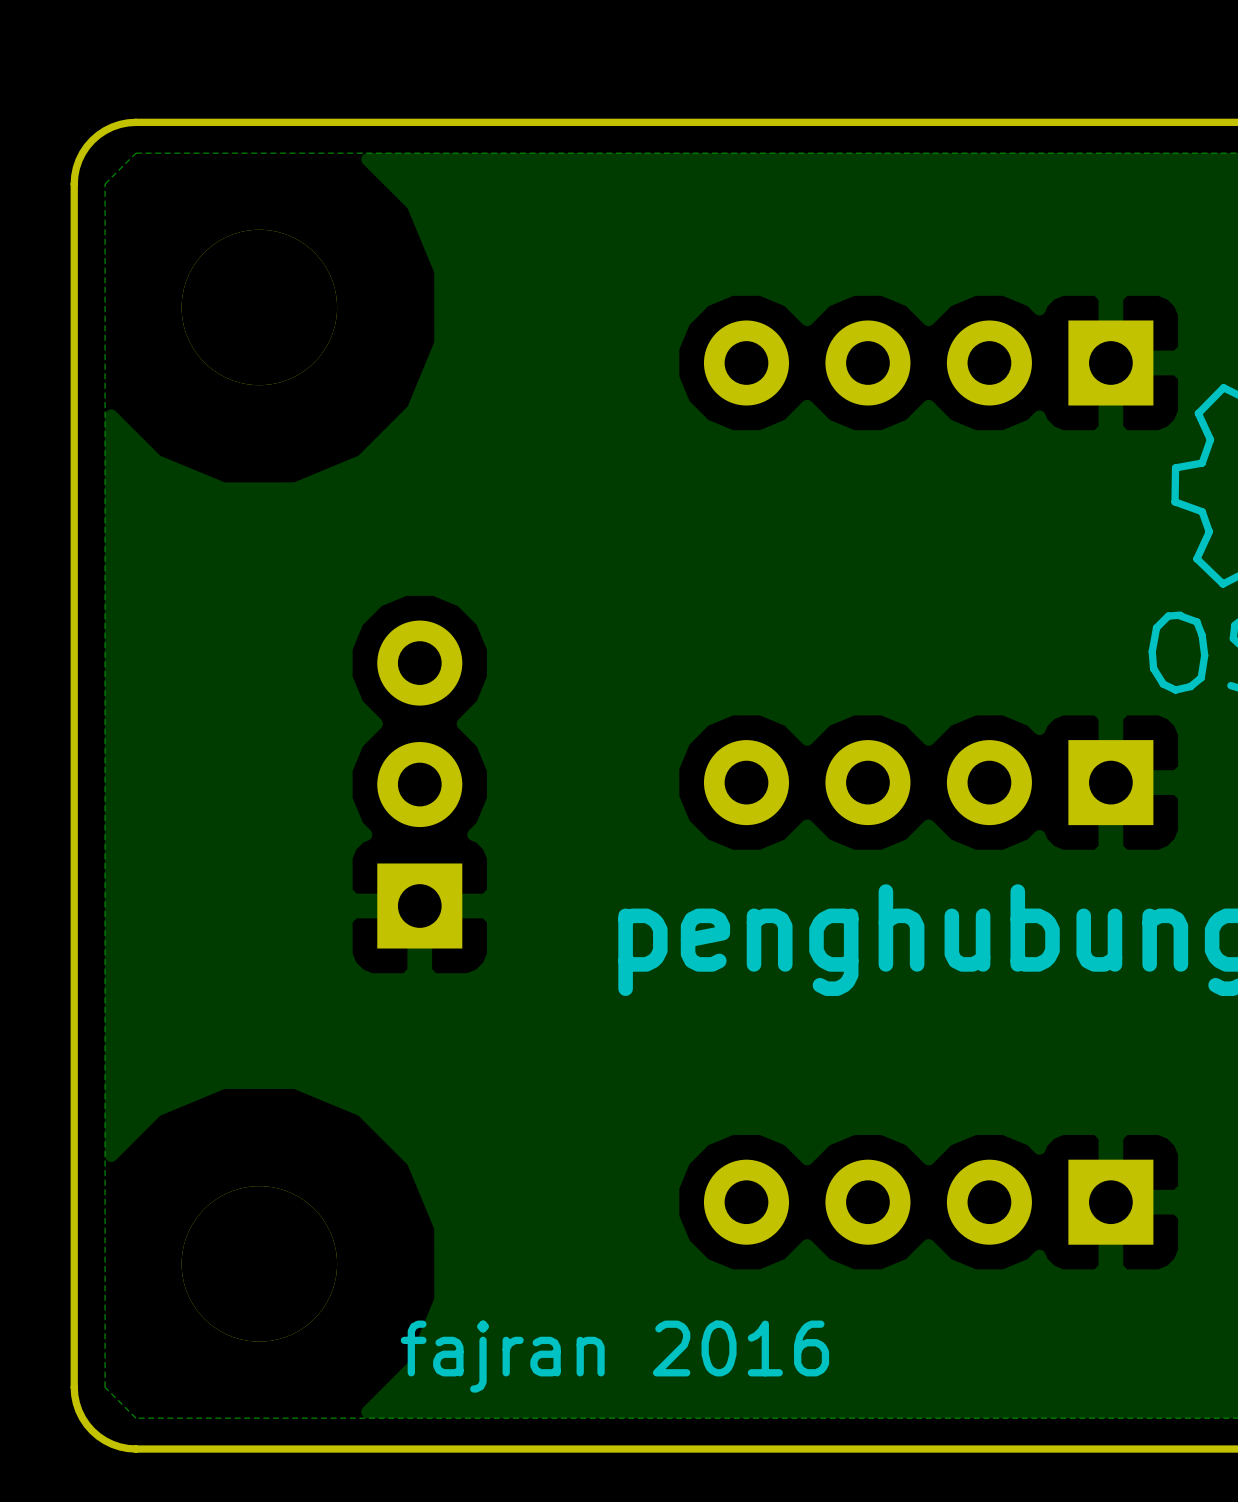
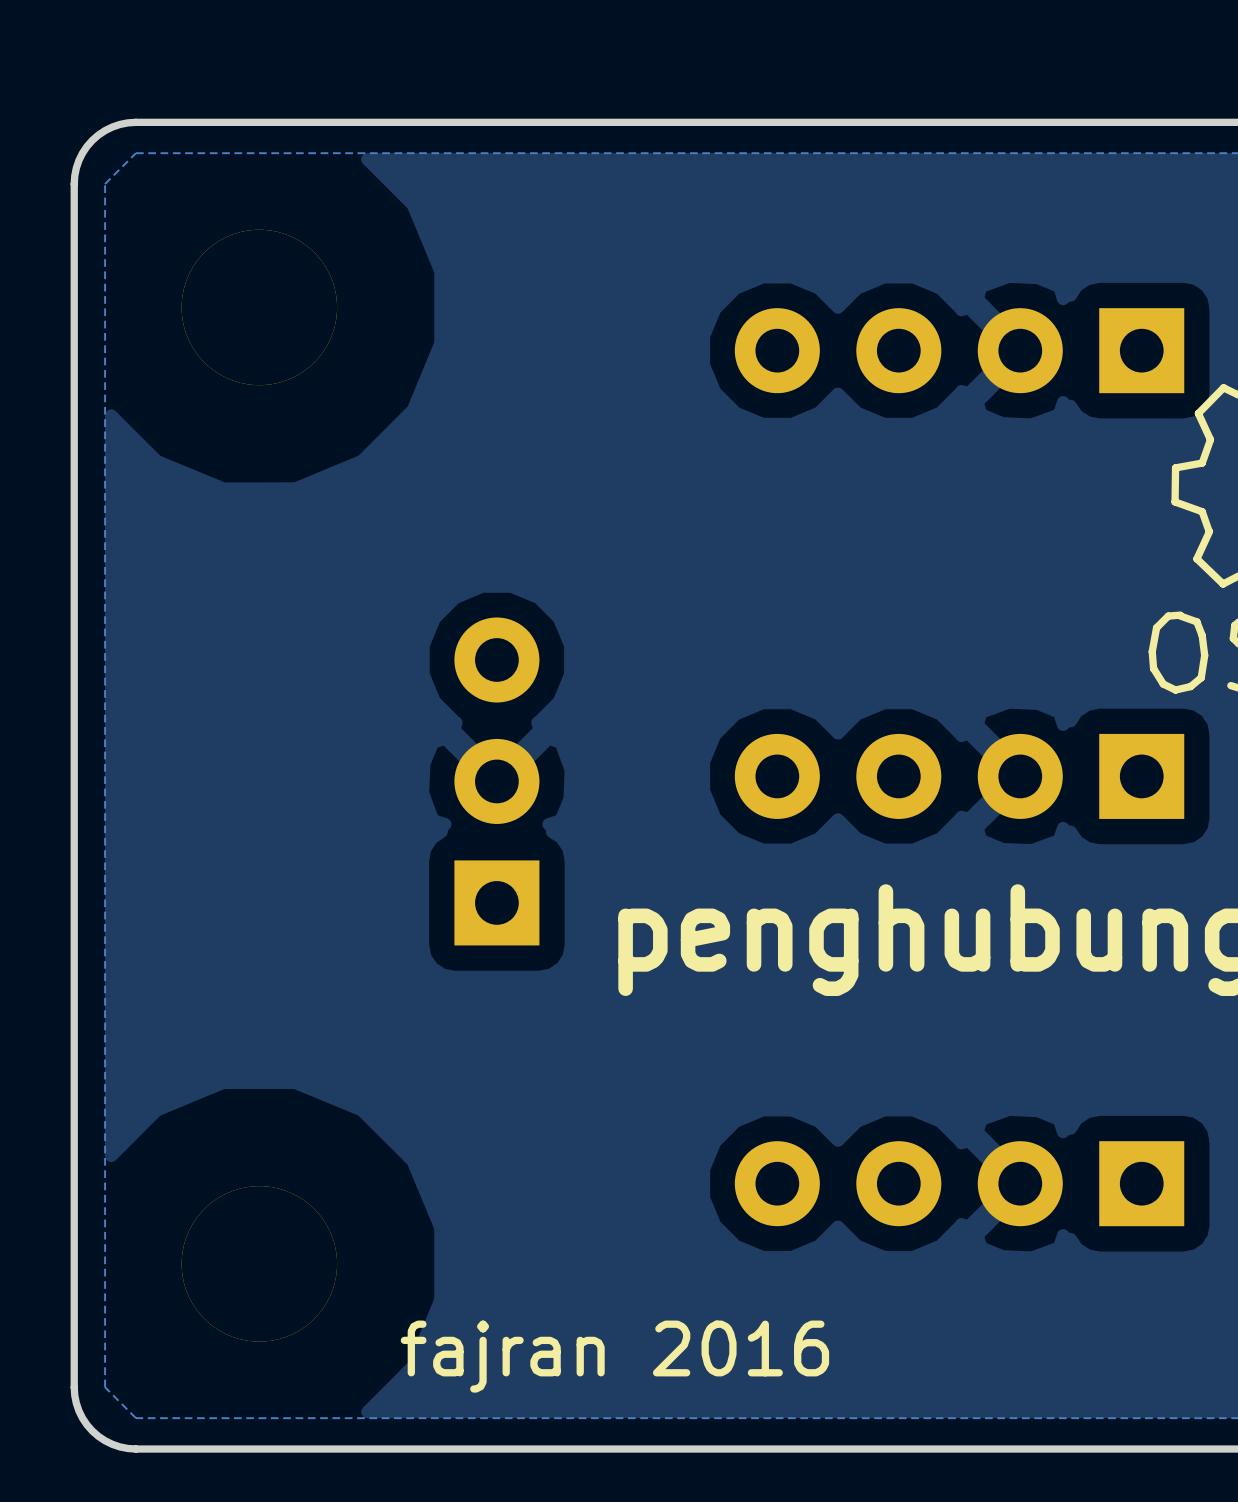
part position: (928, 363) -> (959, 350)
part position: (928, 782) -> (959, 776)
part position: (419, 784) -> (496, 781)
part position: (928, 1202) -> (959, 1183)

